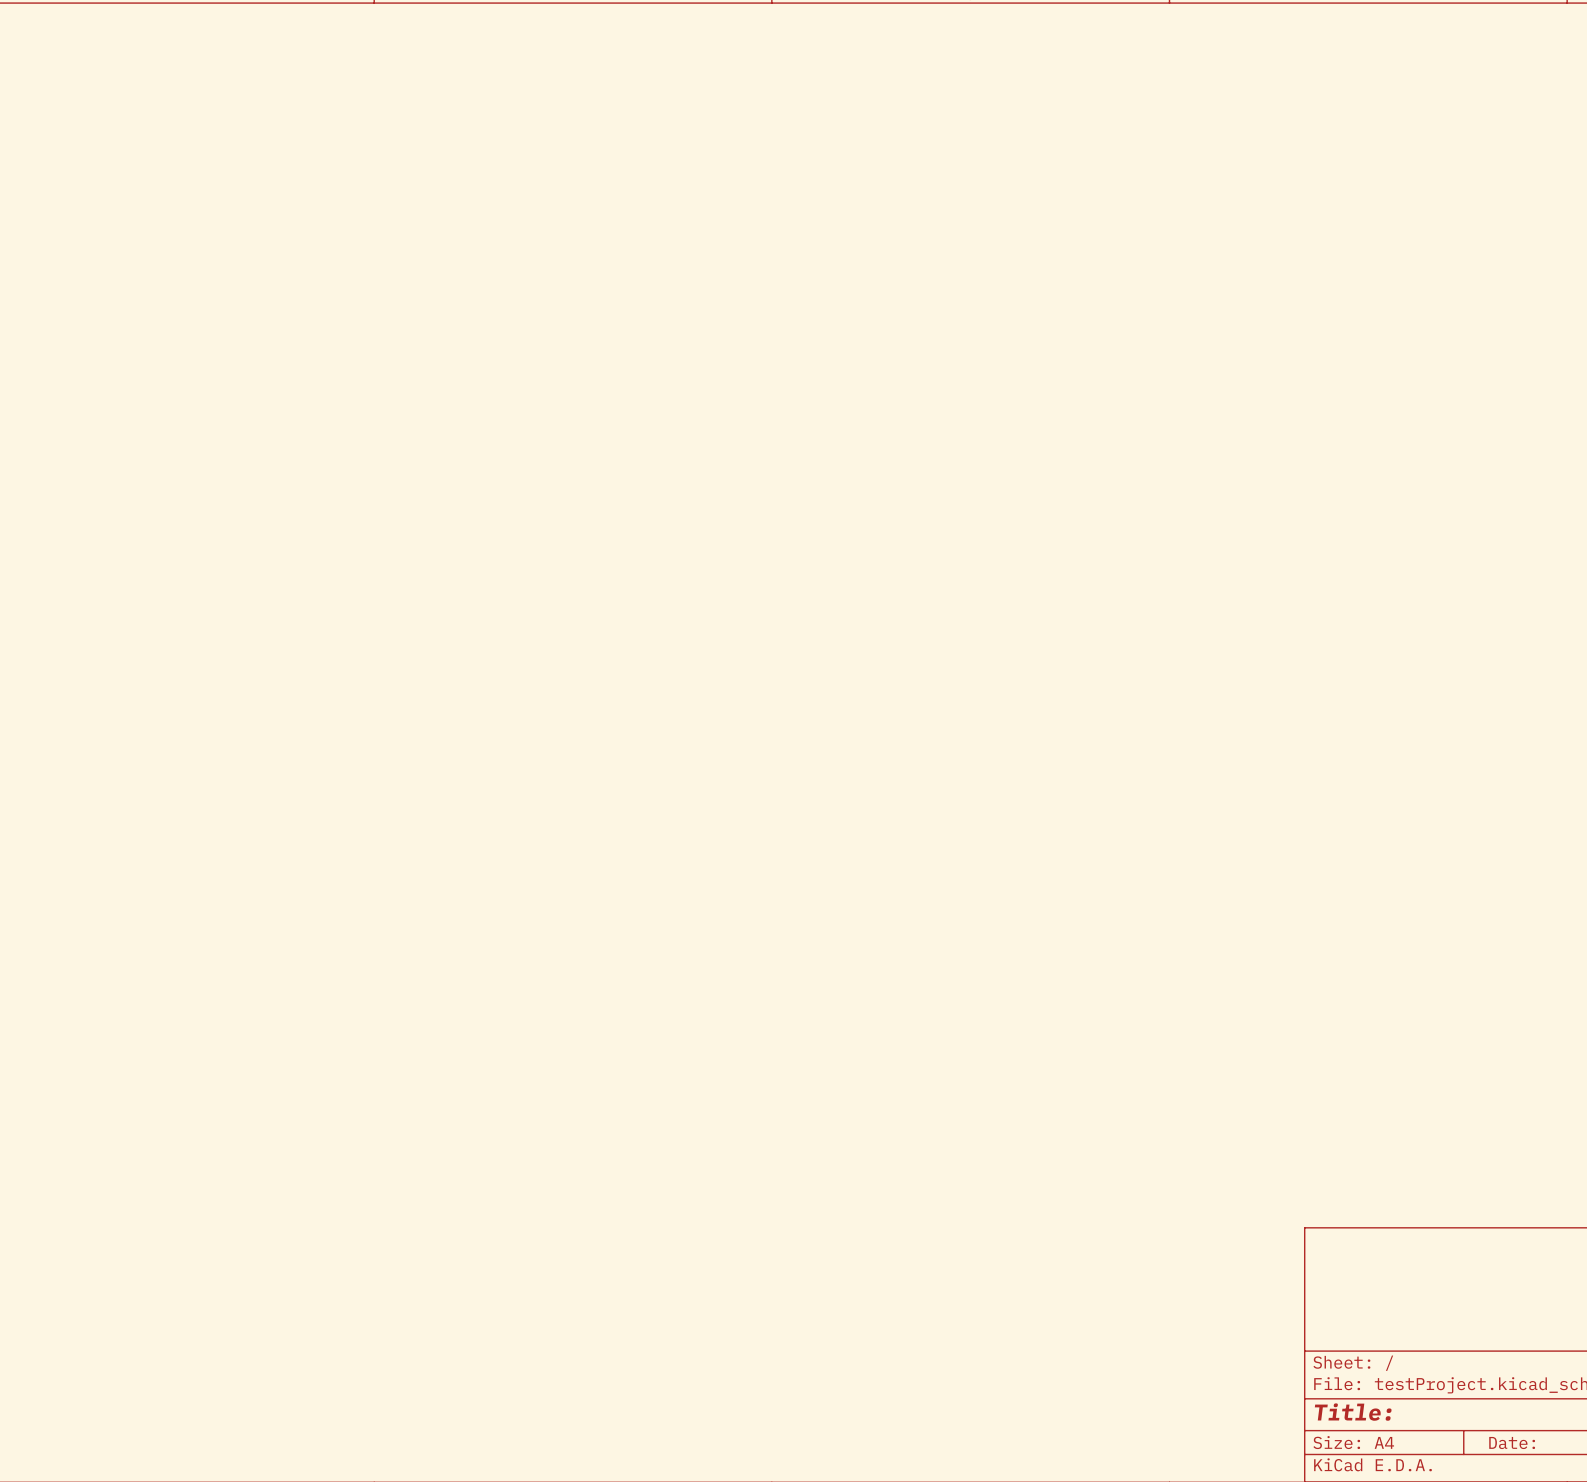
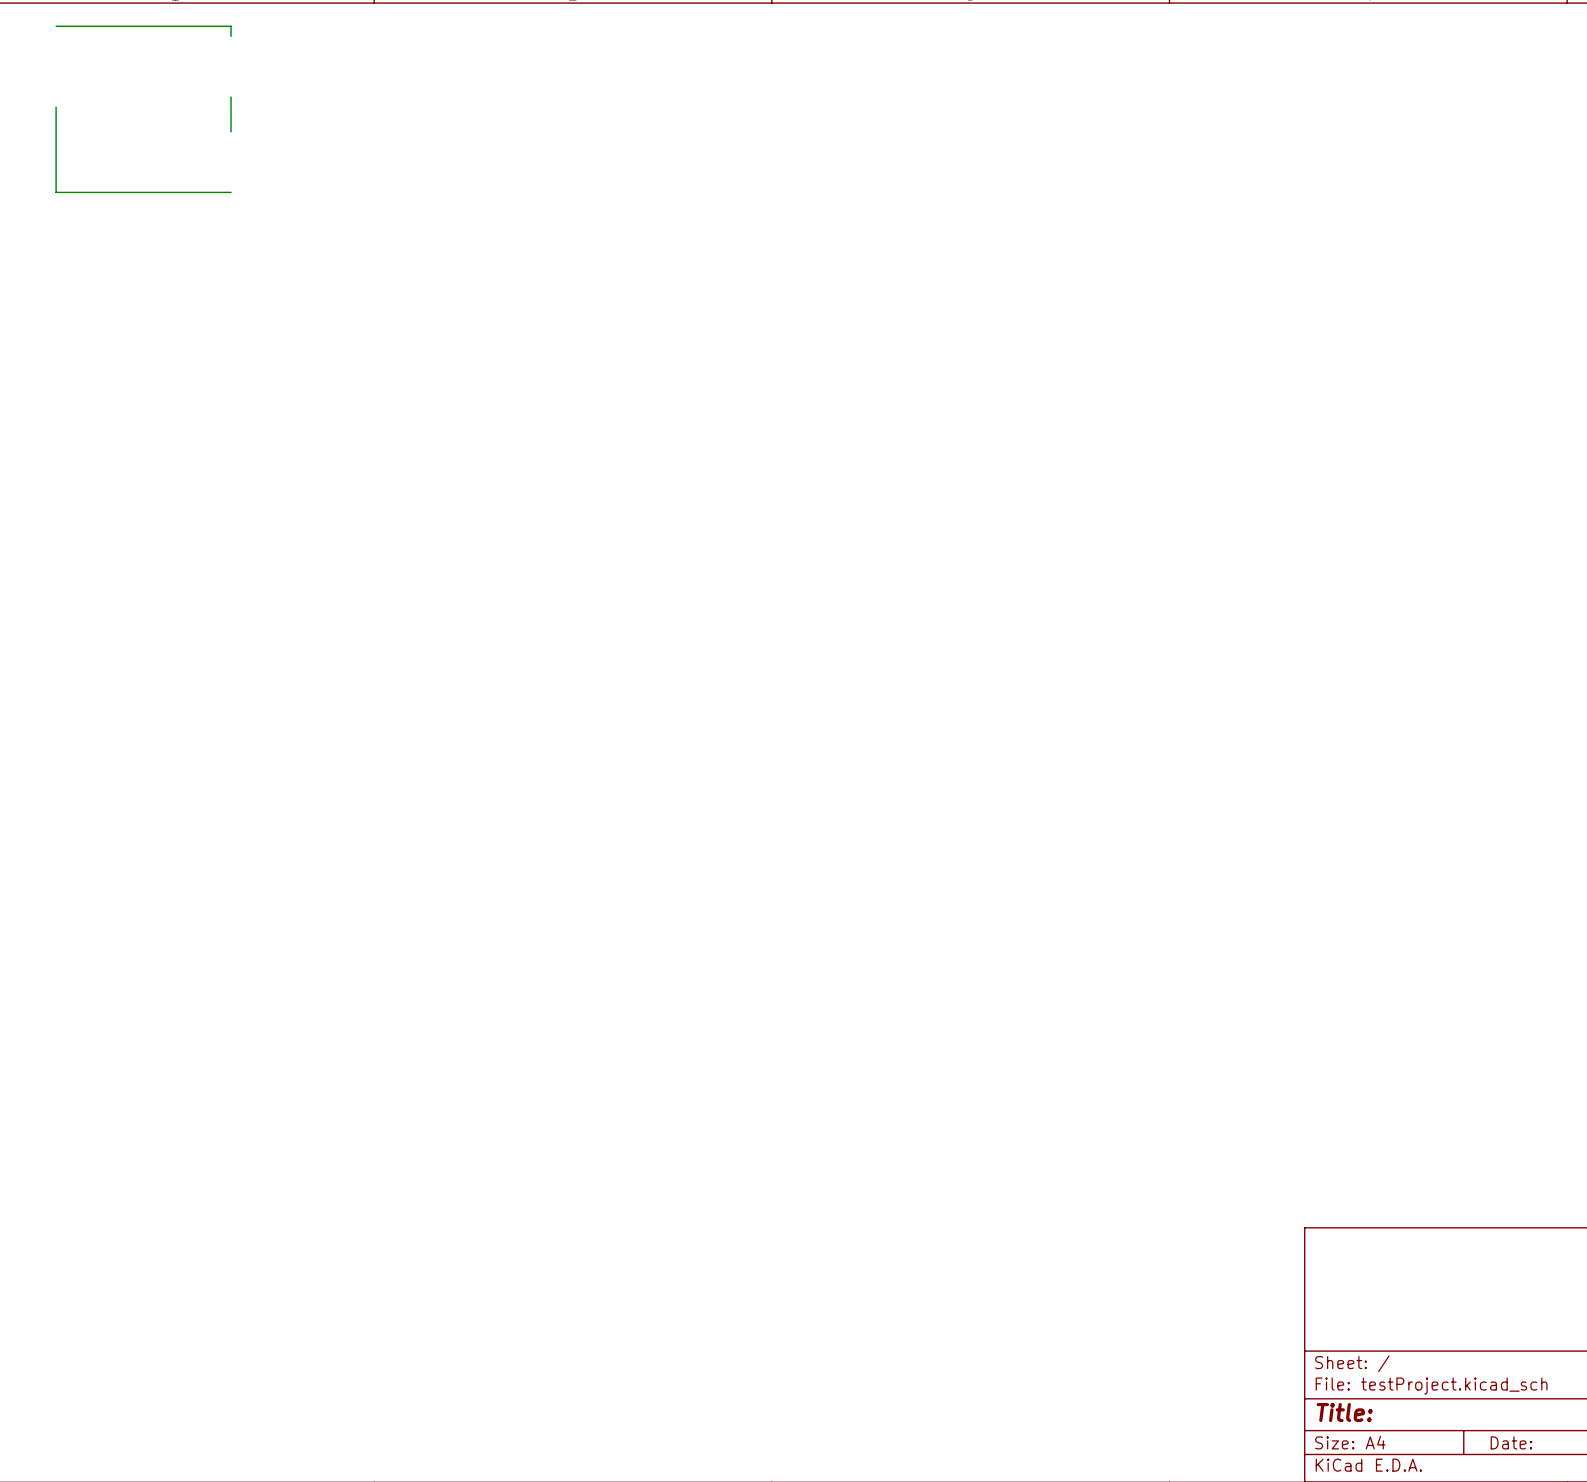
wire: none -> (56, 26) (231, 26) (231, 36)
wire: none -> (231, 96) (231, 131)
wire: none -> (56, 107) (56, 192) (231, 192)

